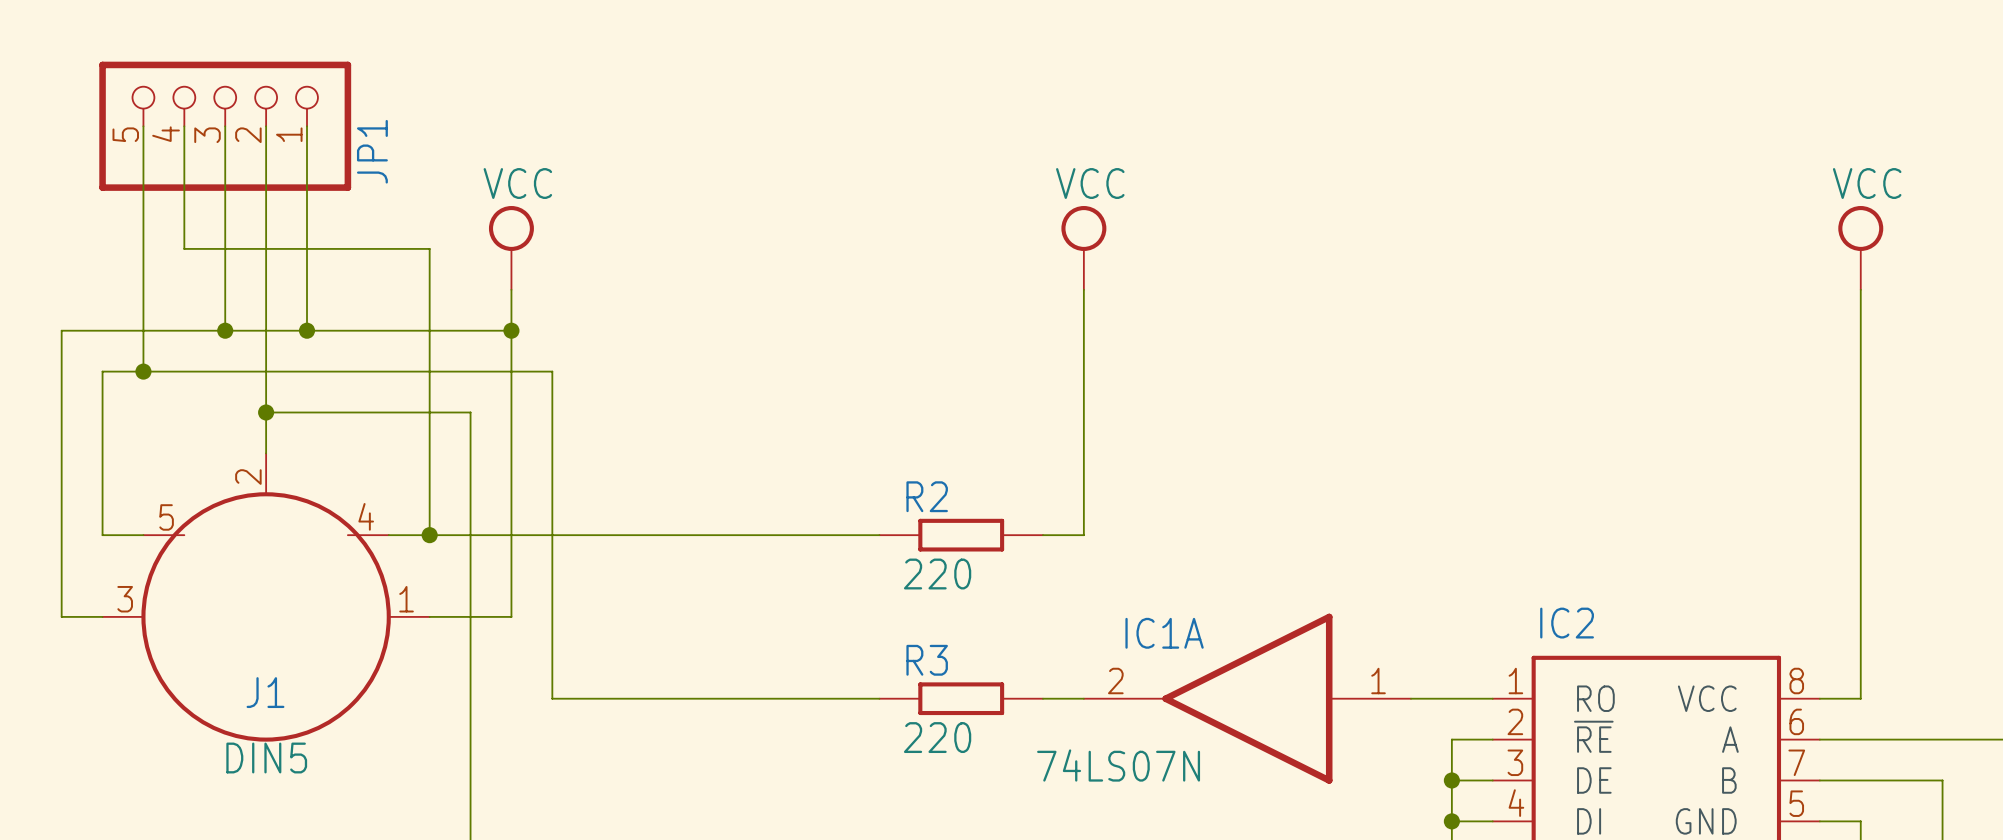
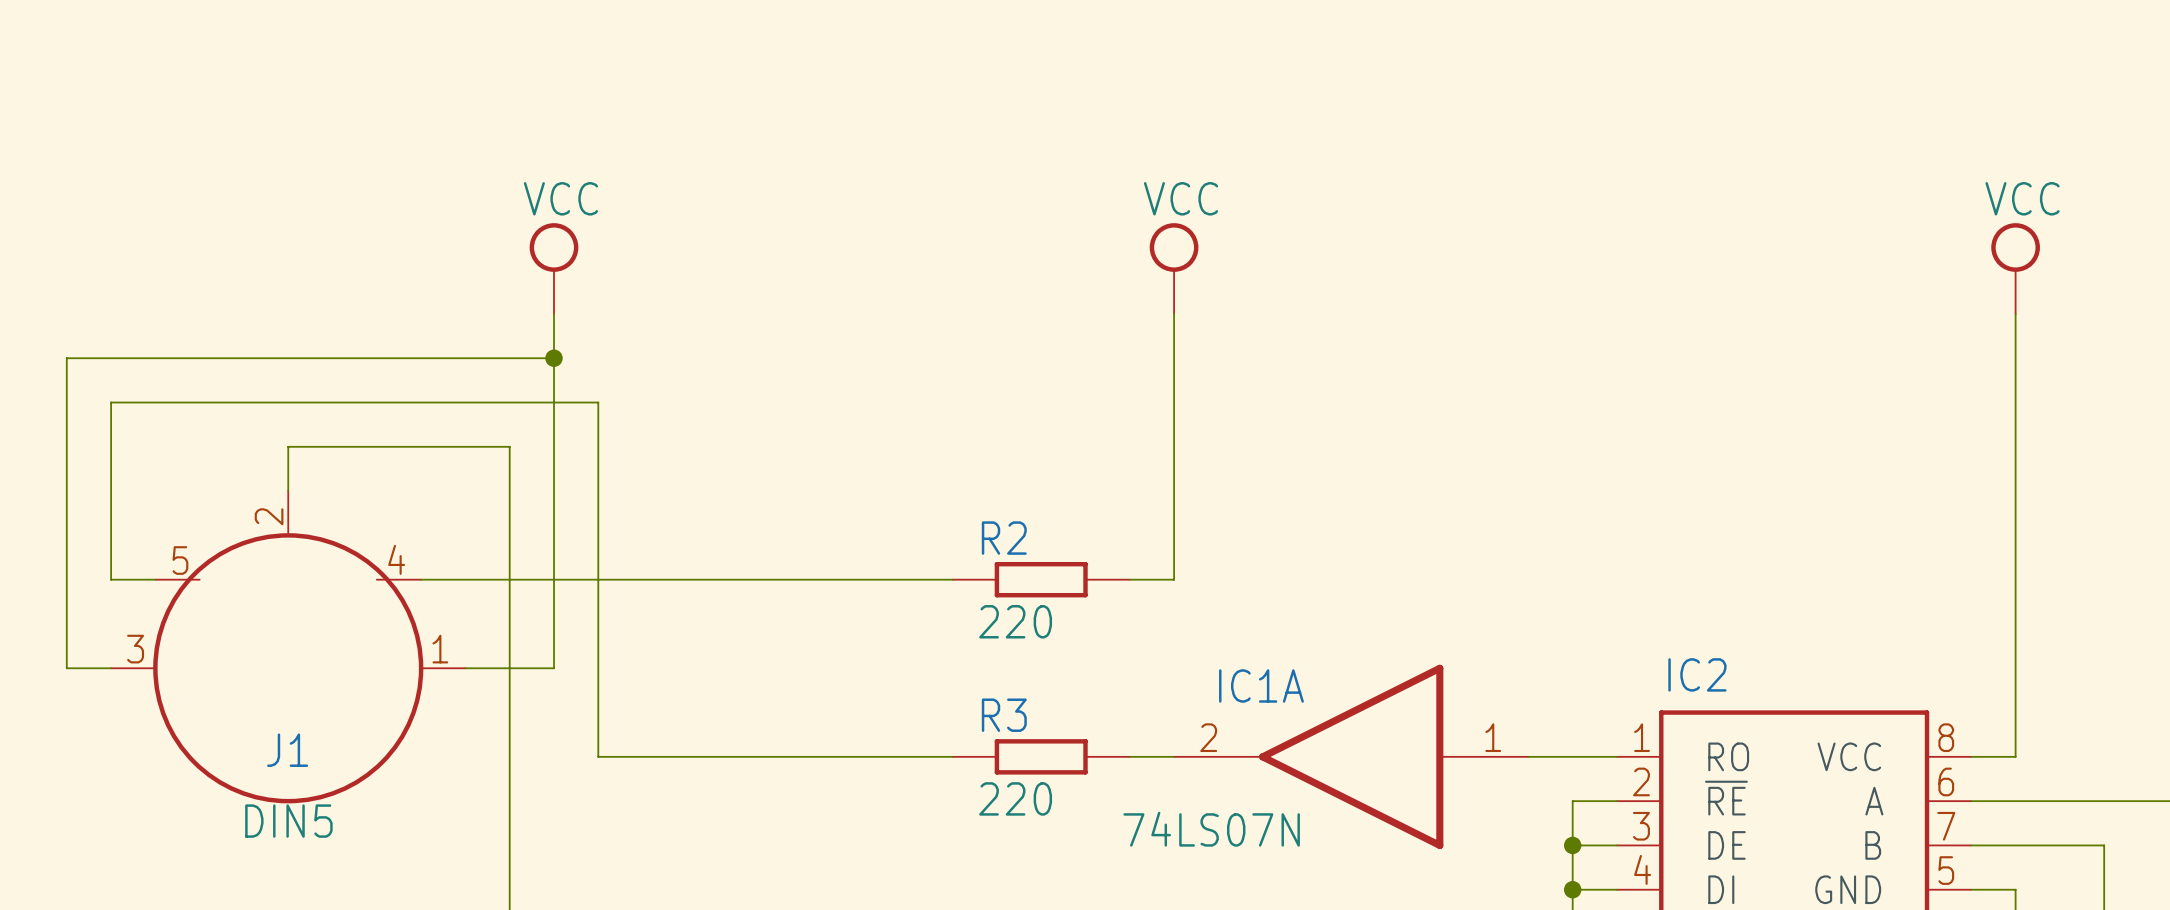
wire: (143, 126) (143, 371) -> none
wire: (184, 126) (184, 248) (429, 248) (429, 535) -> none
wire: (225, 126) (225, 330) -> none
JP1: (225, 126) -> none
wire: (266, 126) (266, 412) -> none
wire: (307, 126) (307, 330) -> none
junction: (225, 330) -> none
junction: (307, 330) -> none
junction: (143, 371) -> none
junction: (266, 412) -> none
junction: (429, 535) -> none

